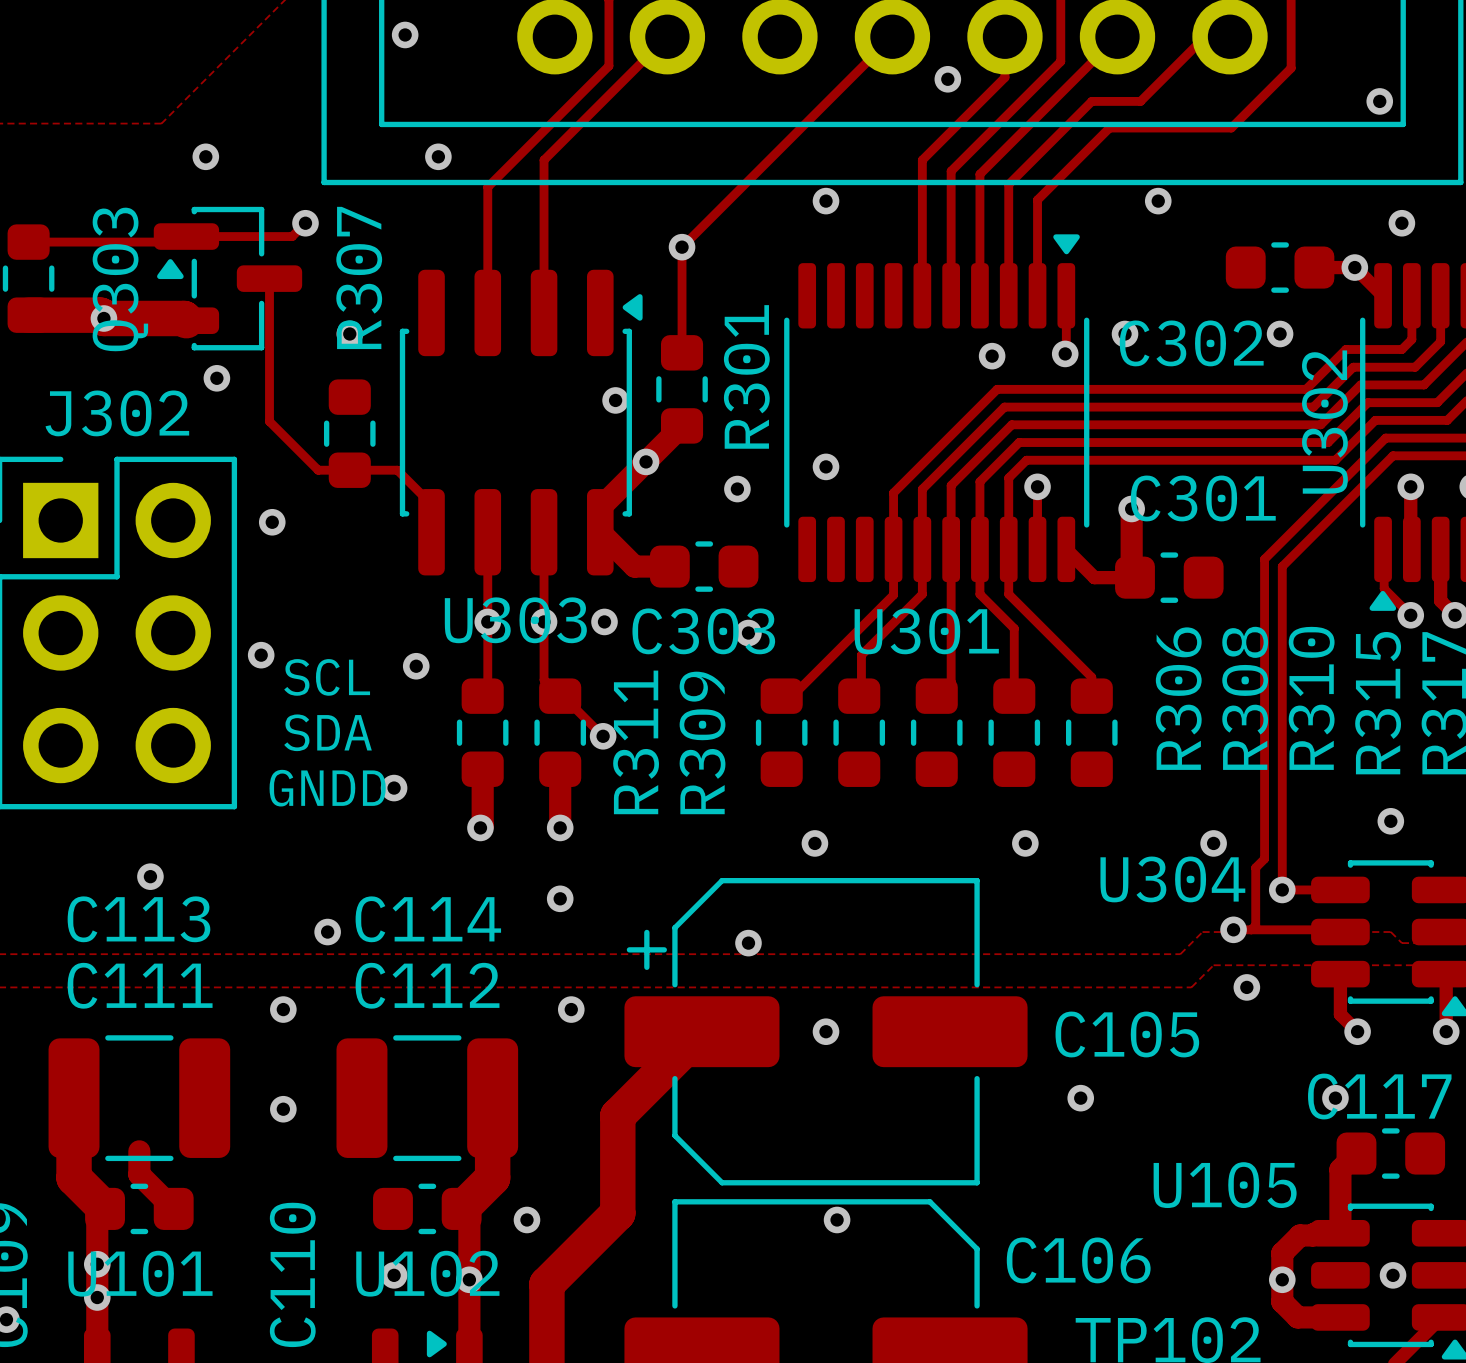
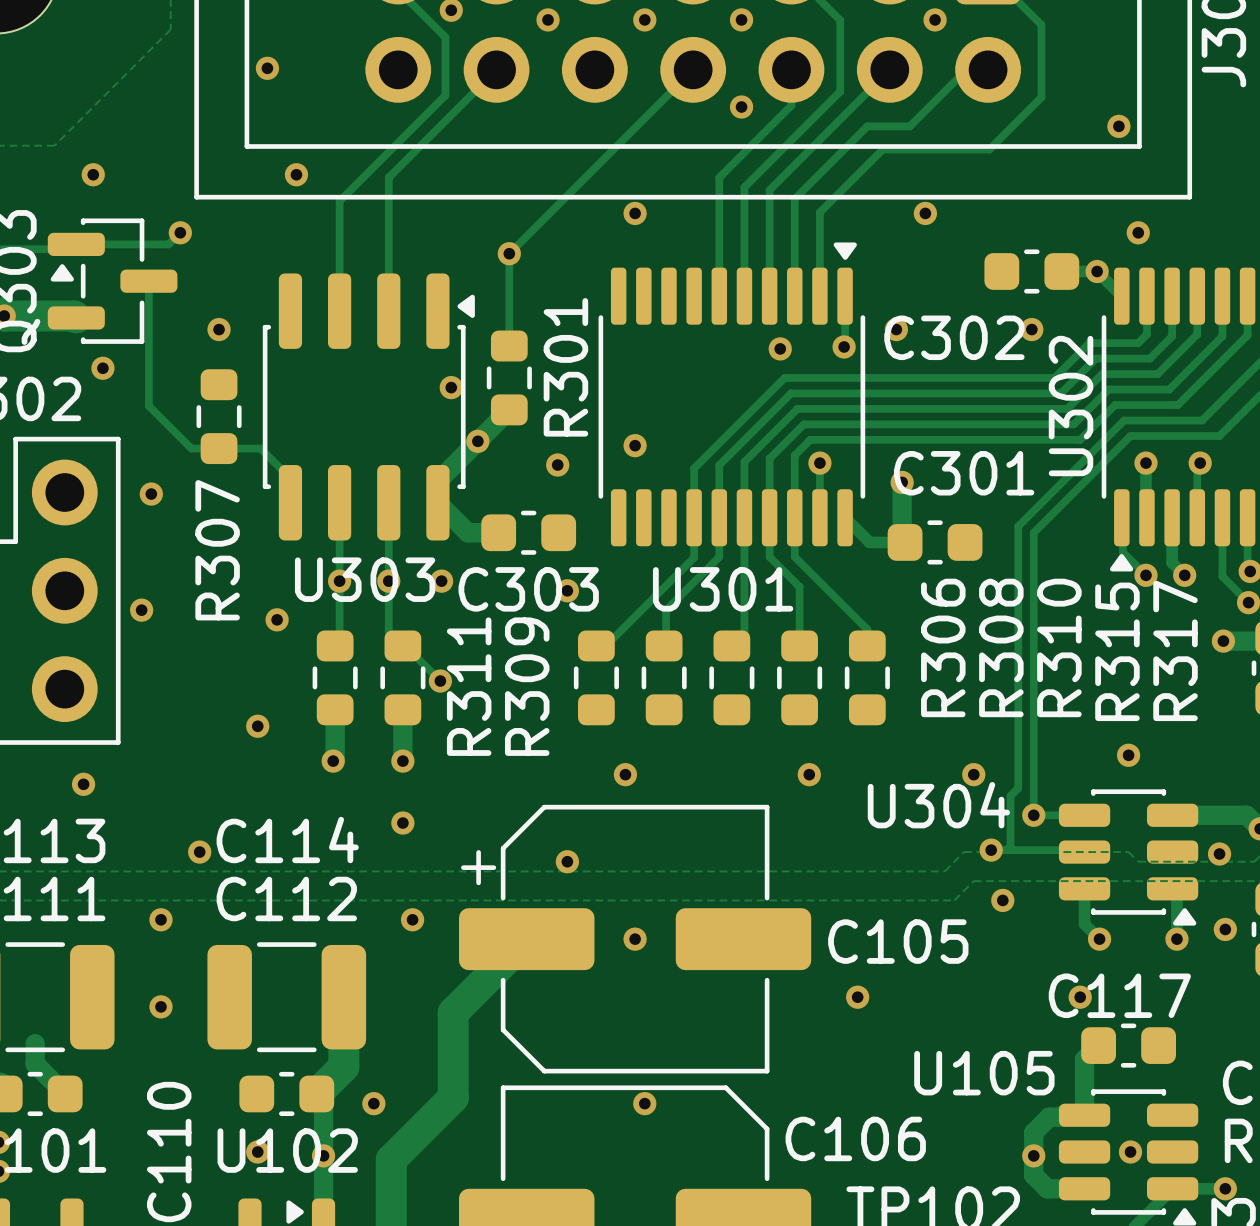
R307 name position: R307 (359, 277) -> R307 (217, 550)
text: SCL (327, 677) -> none
text: SDA (328, 732) -> none
text: GNDD (327, 788) -> none
via position: (150, 876) -> (83, 784)

